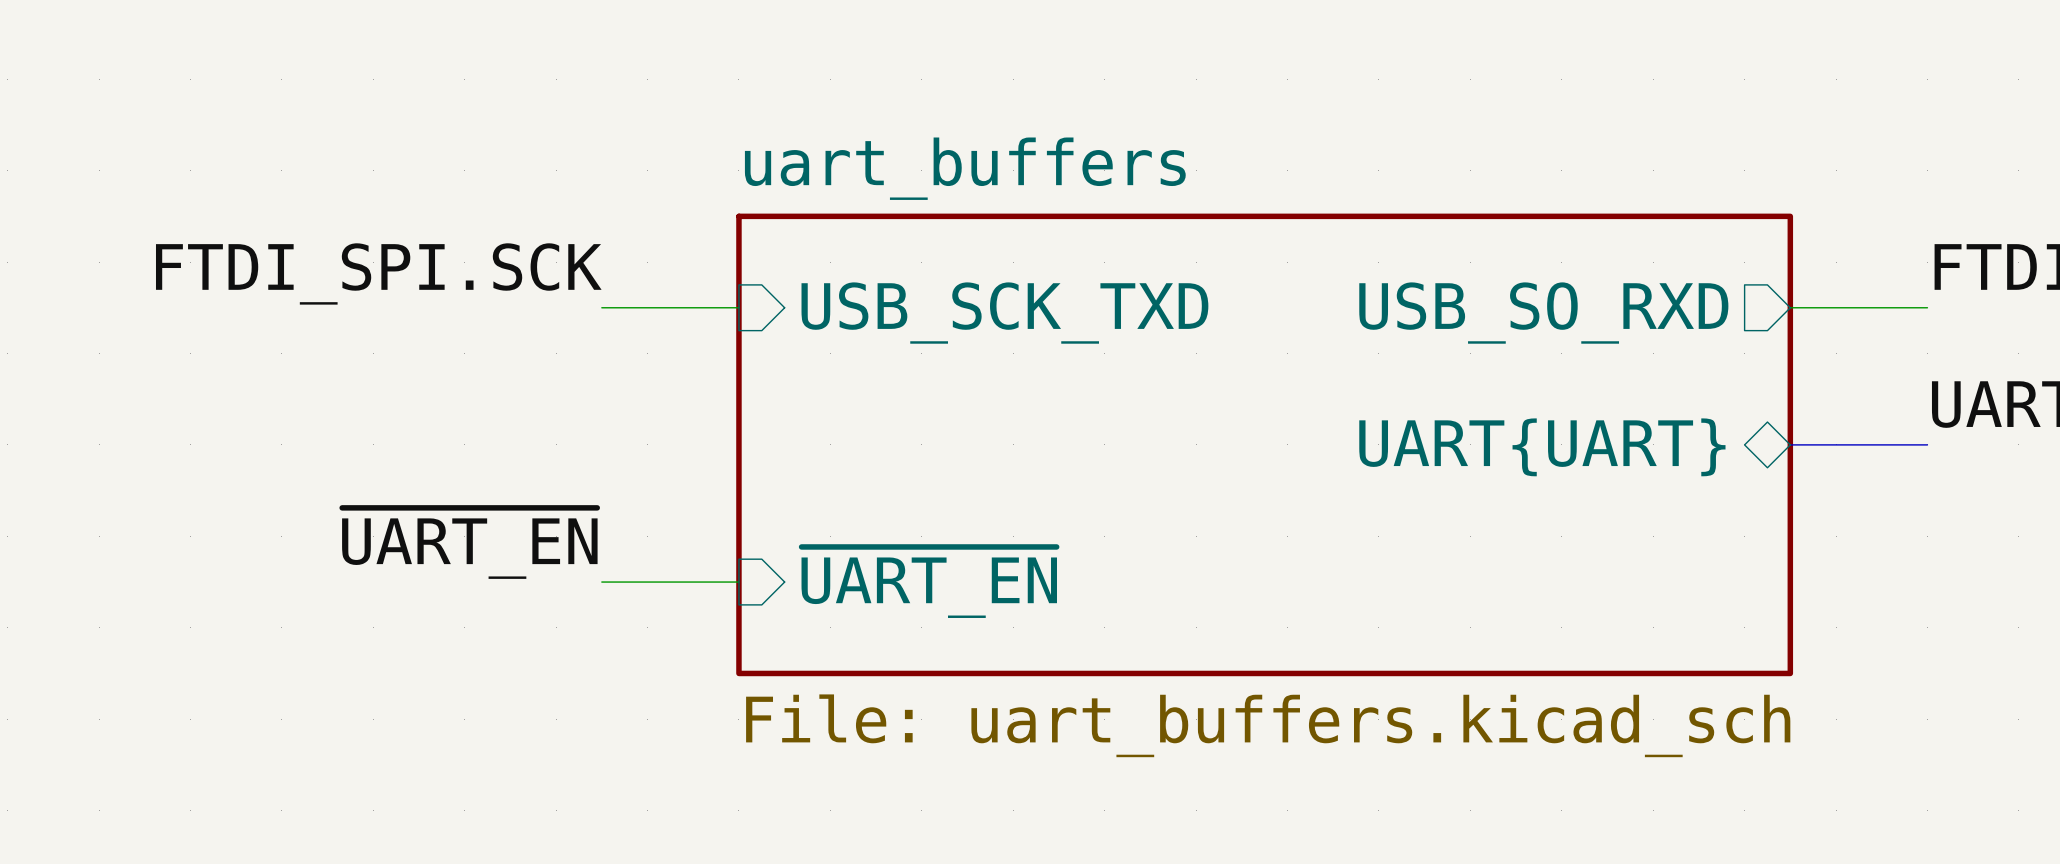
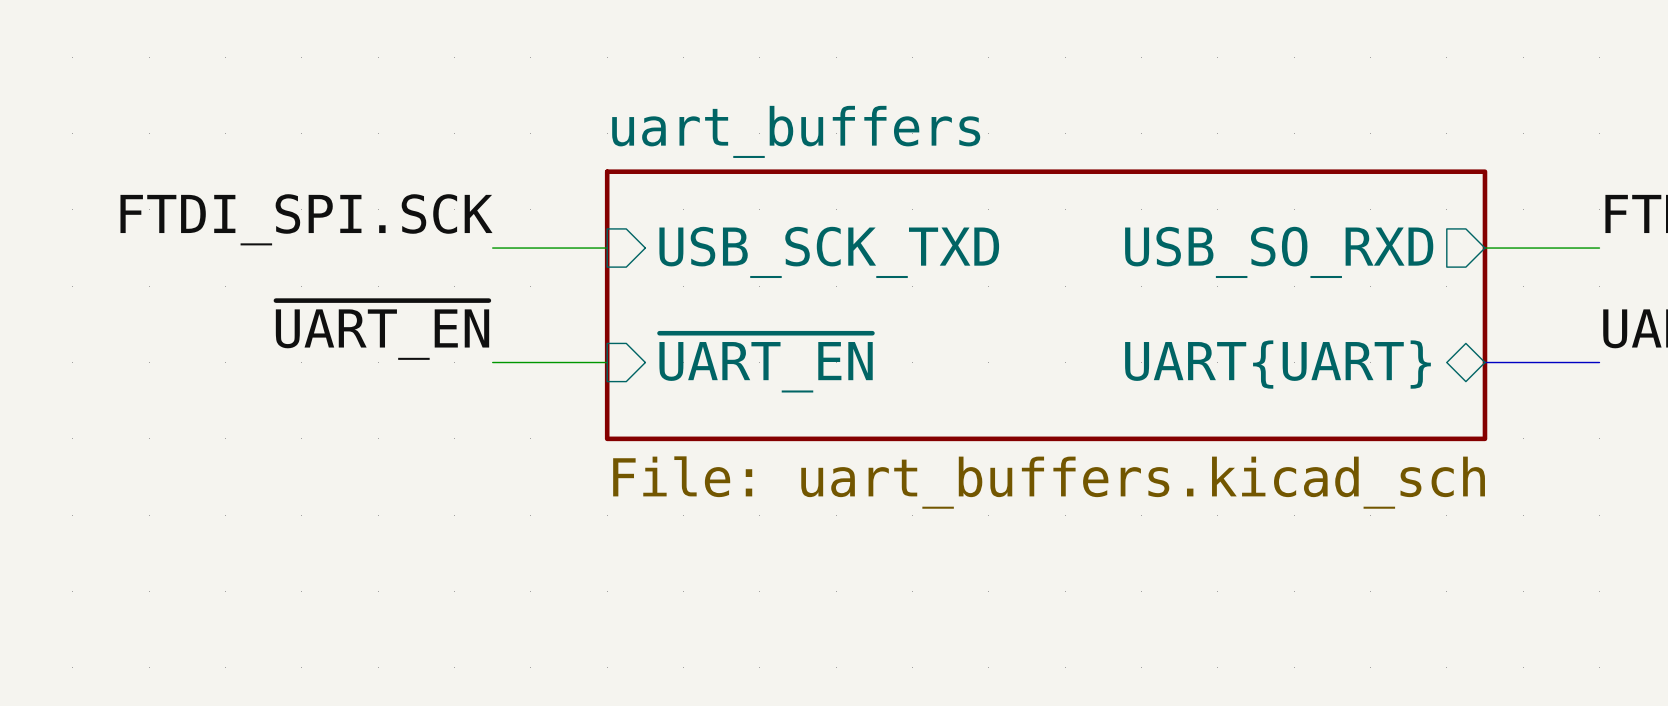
sheet uart_buffers: none -> File: uart_buffers.kicad_sch (1046, 305)
sheet uart_buffers: File: uart_buffers.kicad_sch (1264, 444) -> none
label position: ~{UART_EN} (469, 543) -> ~{UART_EN} (382, 330)
wire: (601, 582) (738, 582) -> (492, 362) (607, 362)
sheet pin position: ~{UART_EN} (929, 582) -> ~{UART_EN} (766, 362)

